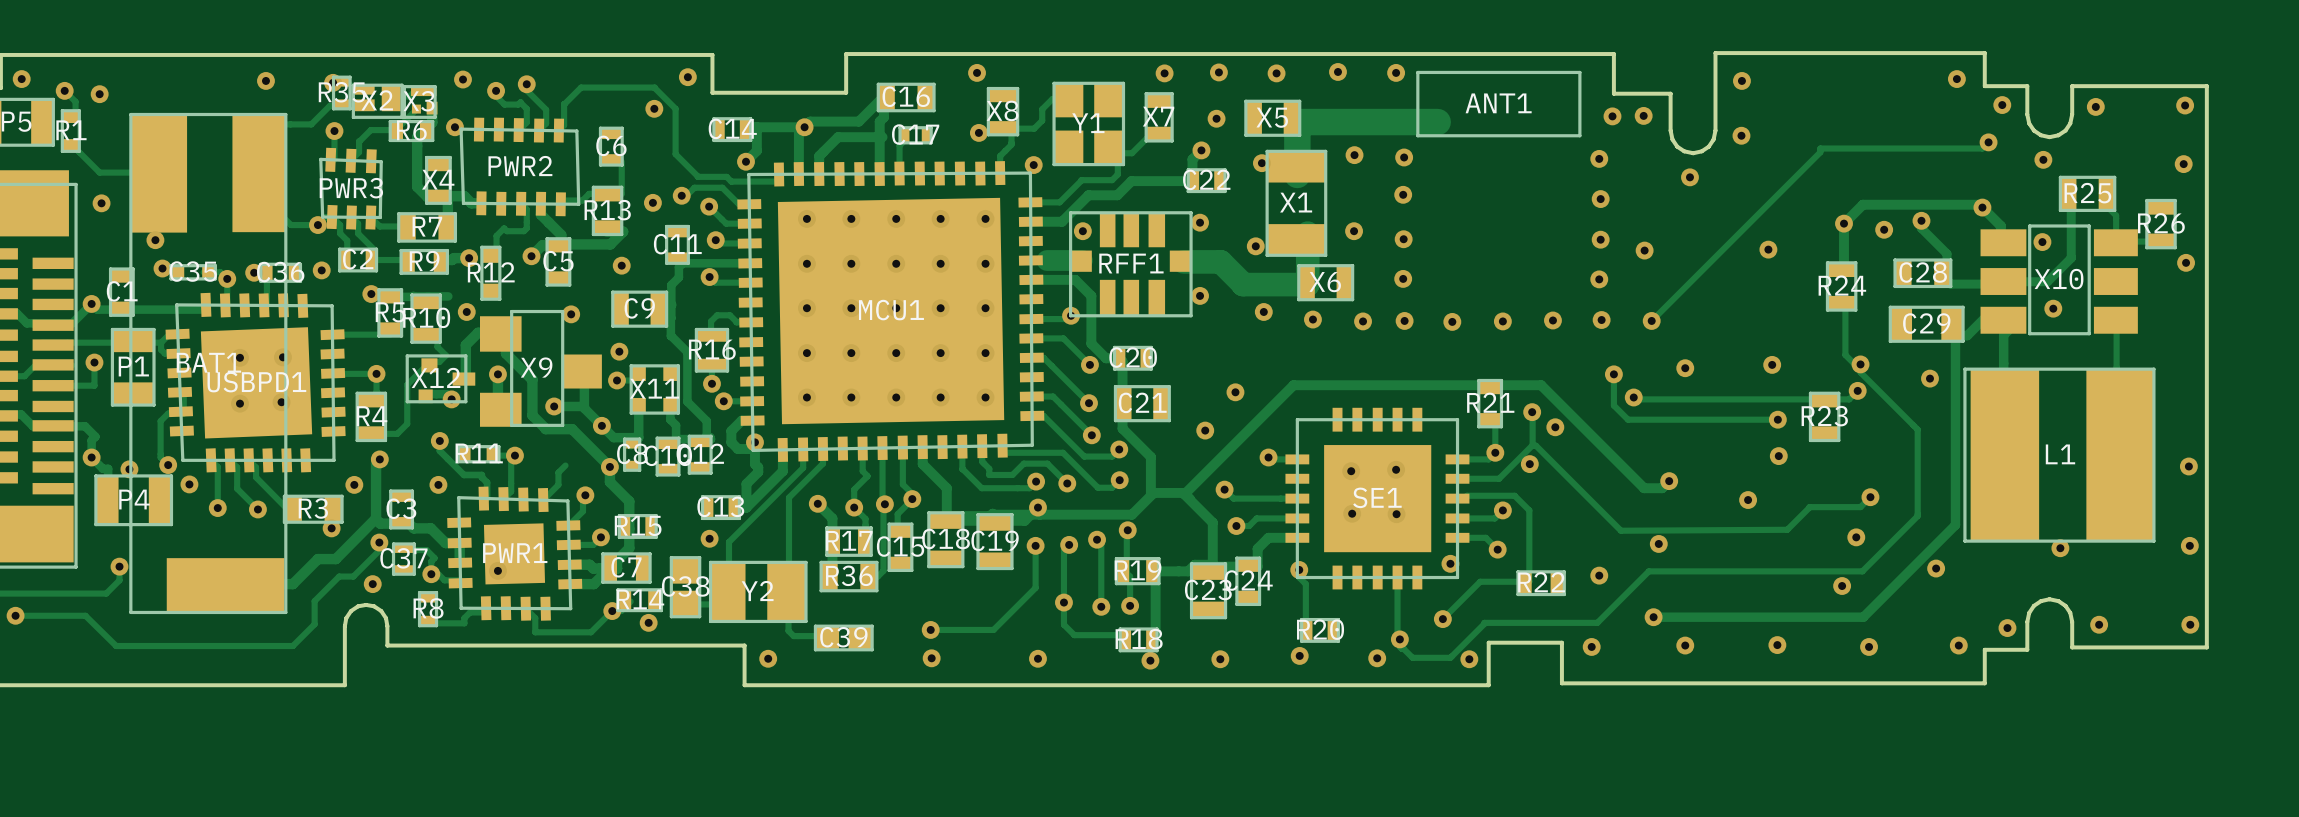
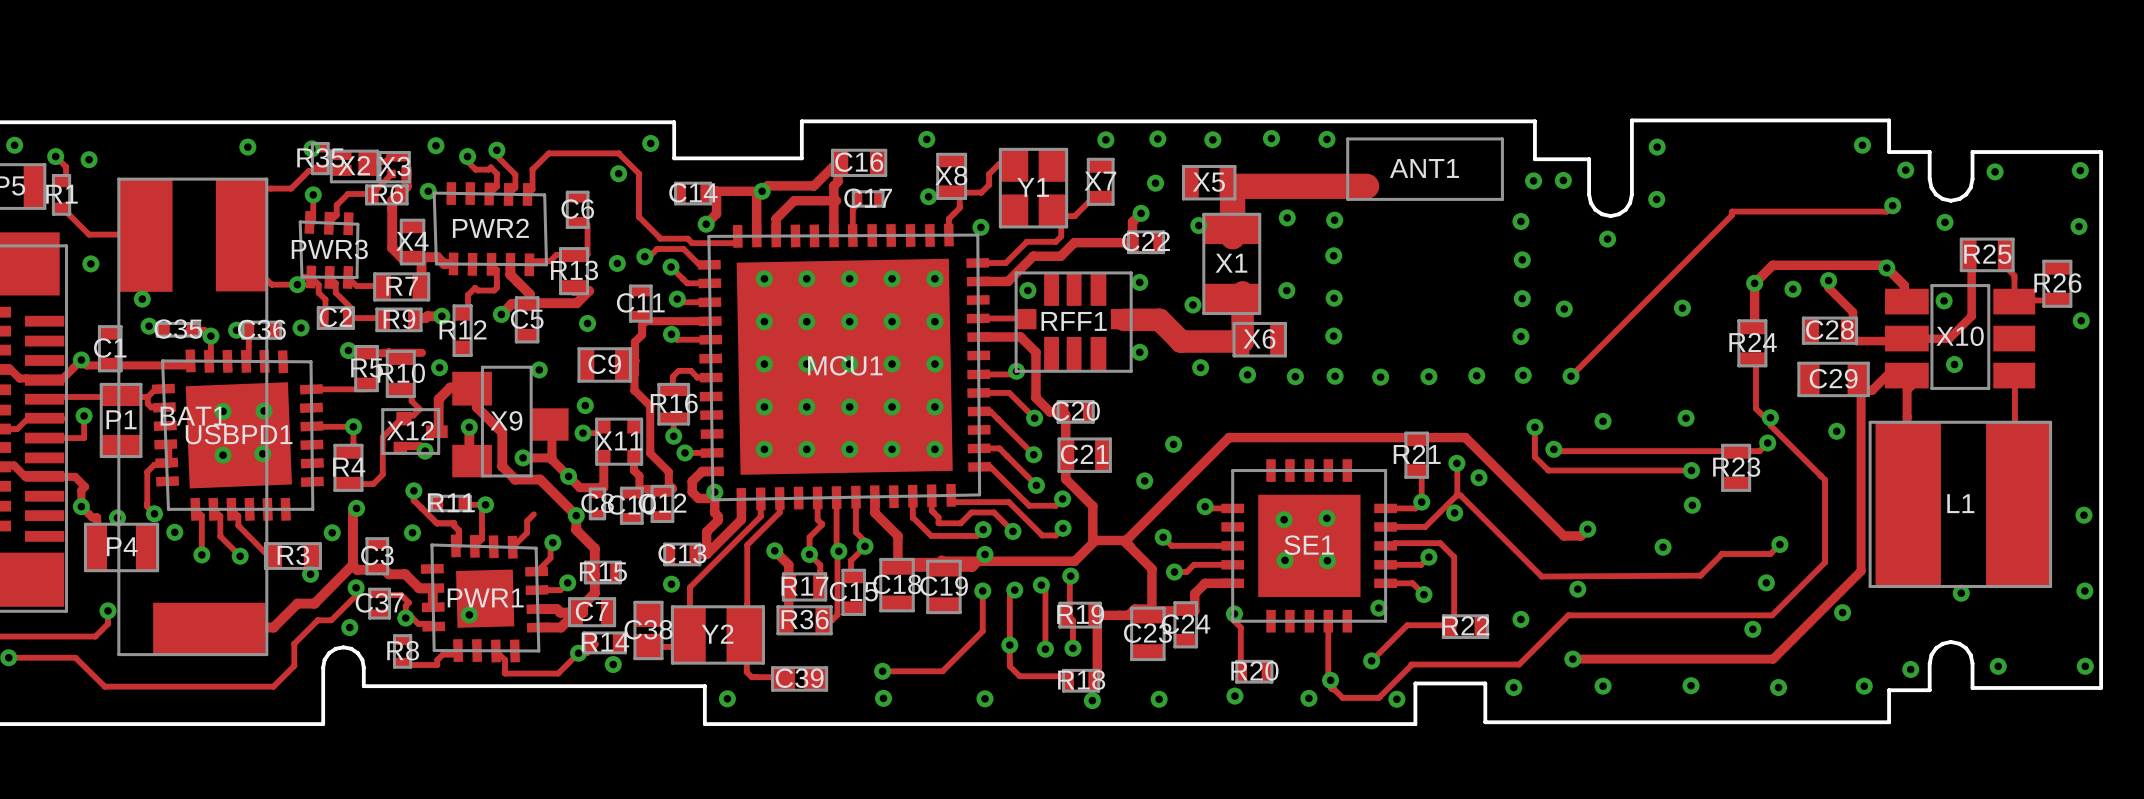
track width: thick (1046, 260) (1082, 260) -> thin (993, 318) (1027, 318)

